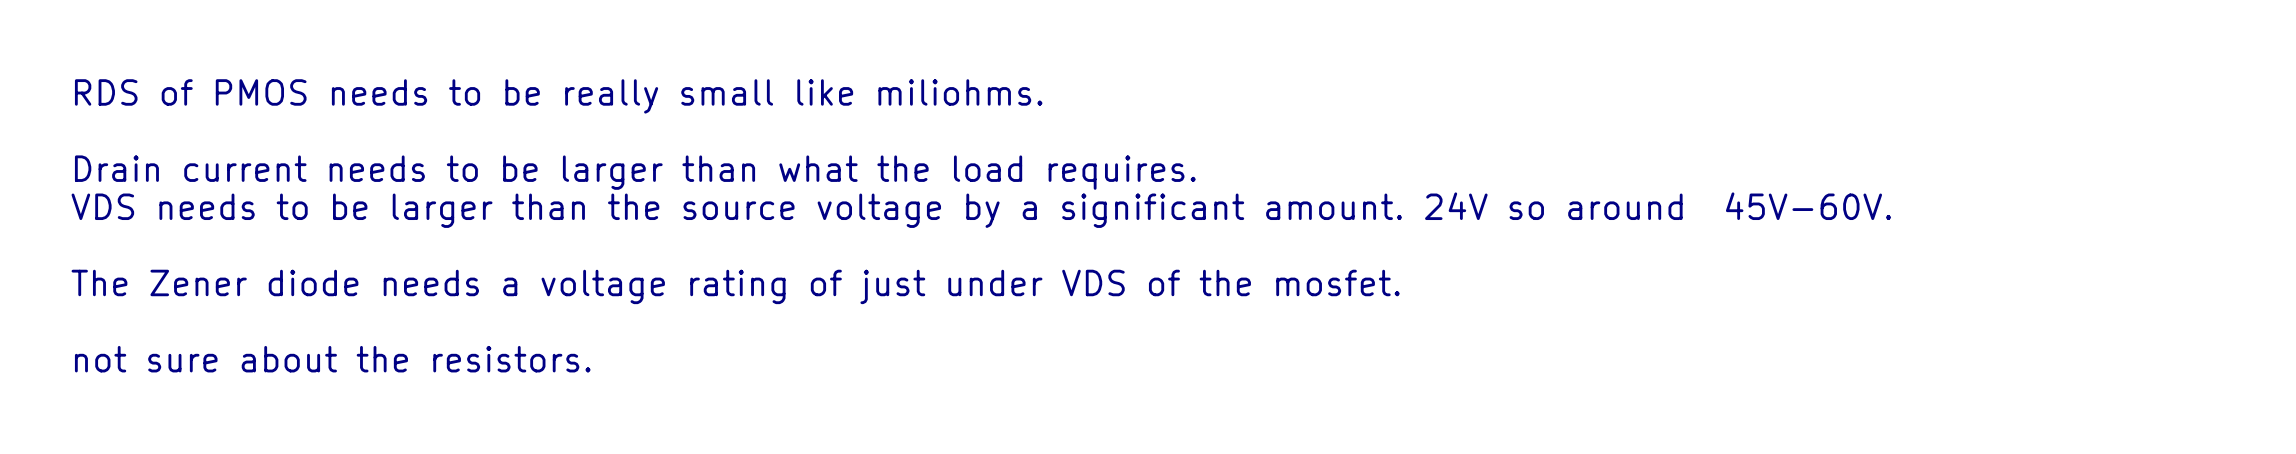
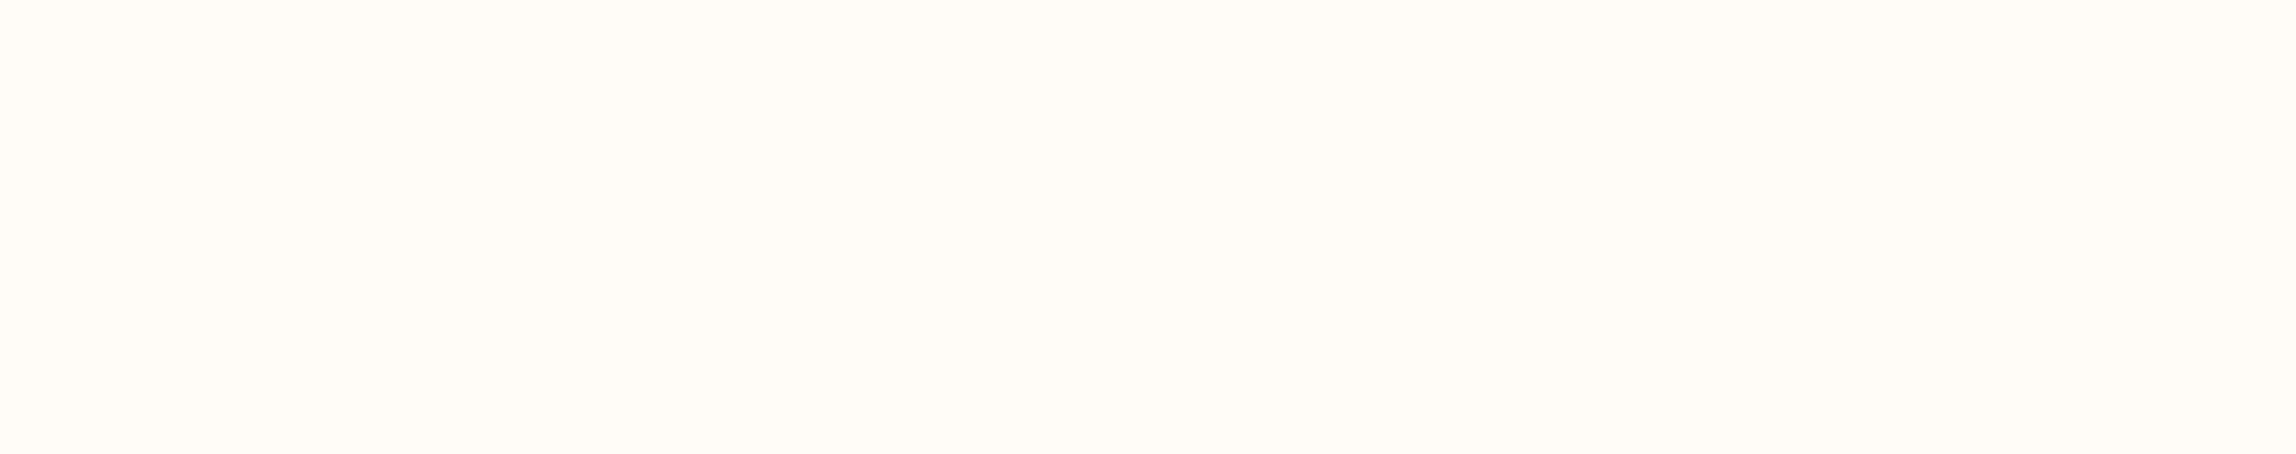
text: RDS of PMOS needs to be really small like miliohms. (558, 96) -> none
text: Drain current needs to be larger than what the load requires. (635, 172) -> none
text: VDS needs to be larger than the source voltage by a significant amount. 24V so around 45V-60V. (981, 210) -> none
text: The Zener diode needs a voltage rating of just under VDS of the mosfet. (735, 286) -> none
text: not sure about the resistors. (332, 359) -> none

